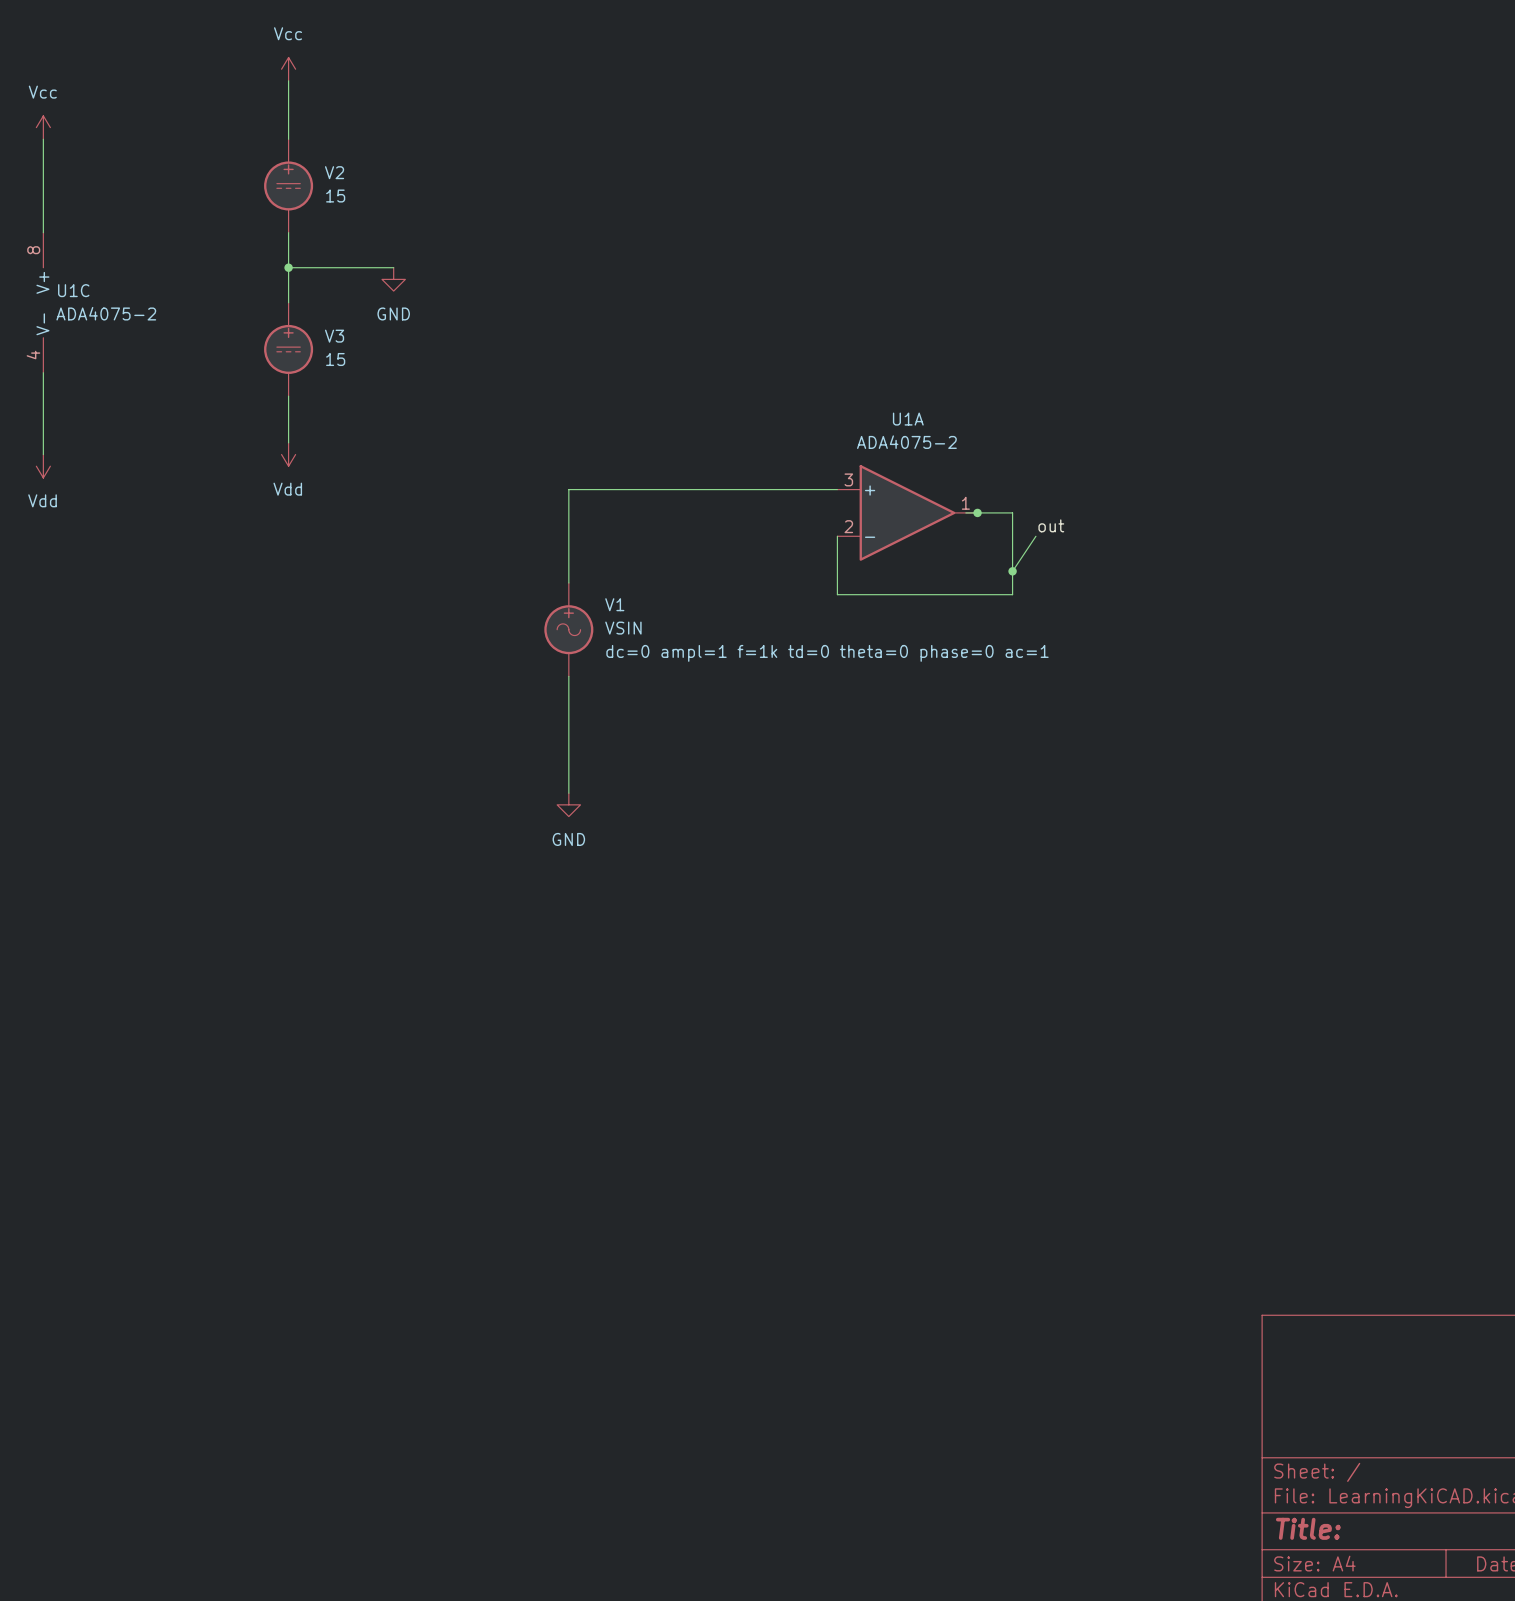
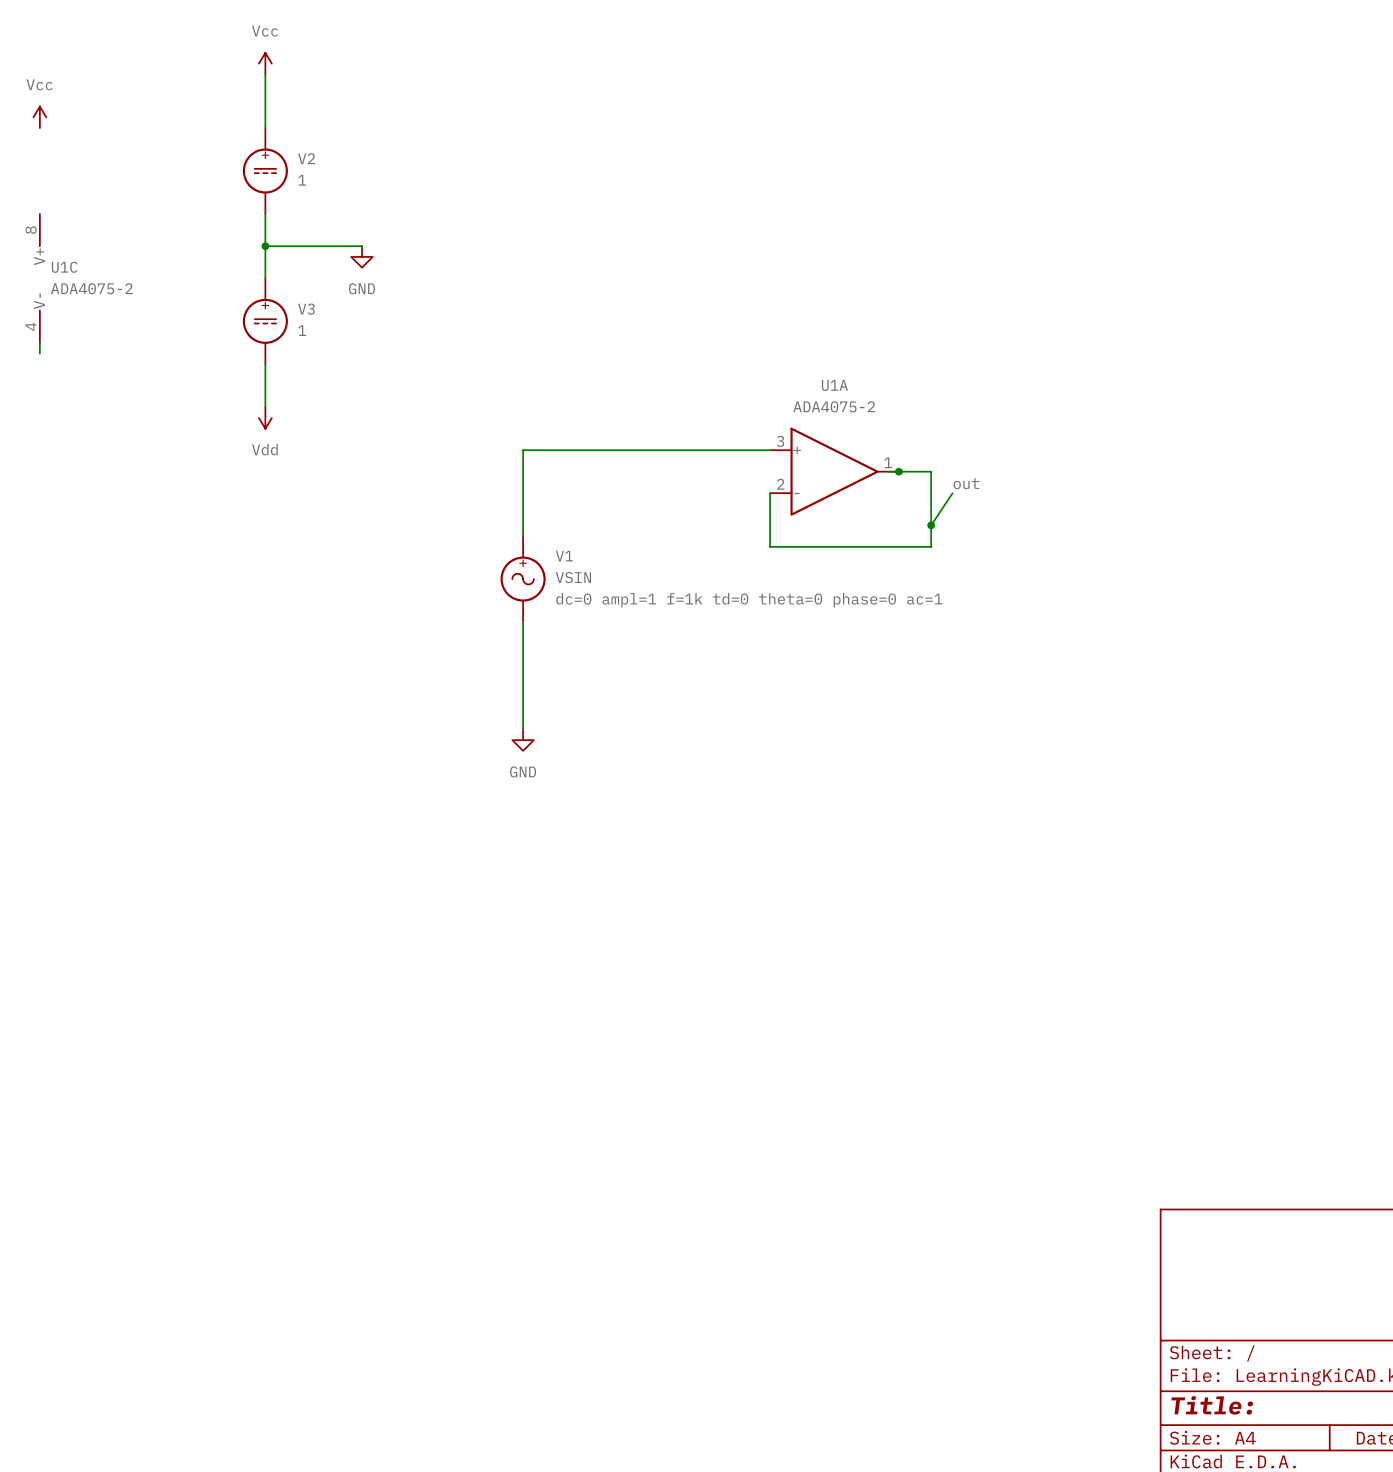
wire: (43, 139) (43, 232) -> none
V2 value: 15 (335, 196) -> 1 (302, 180)
V3 value: 15 (335, 359) -> 1 (302, 330)
wire: (43, 384) (43, 454) -> none
power symbol: Vdd (43, 466) -> none

